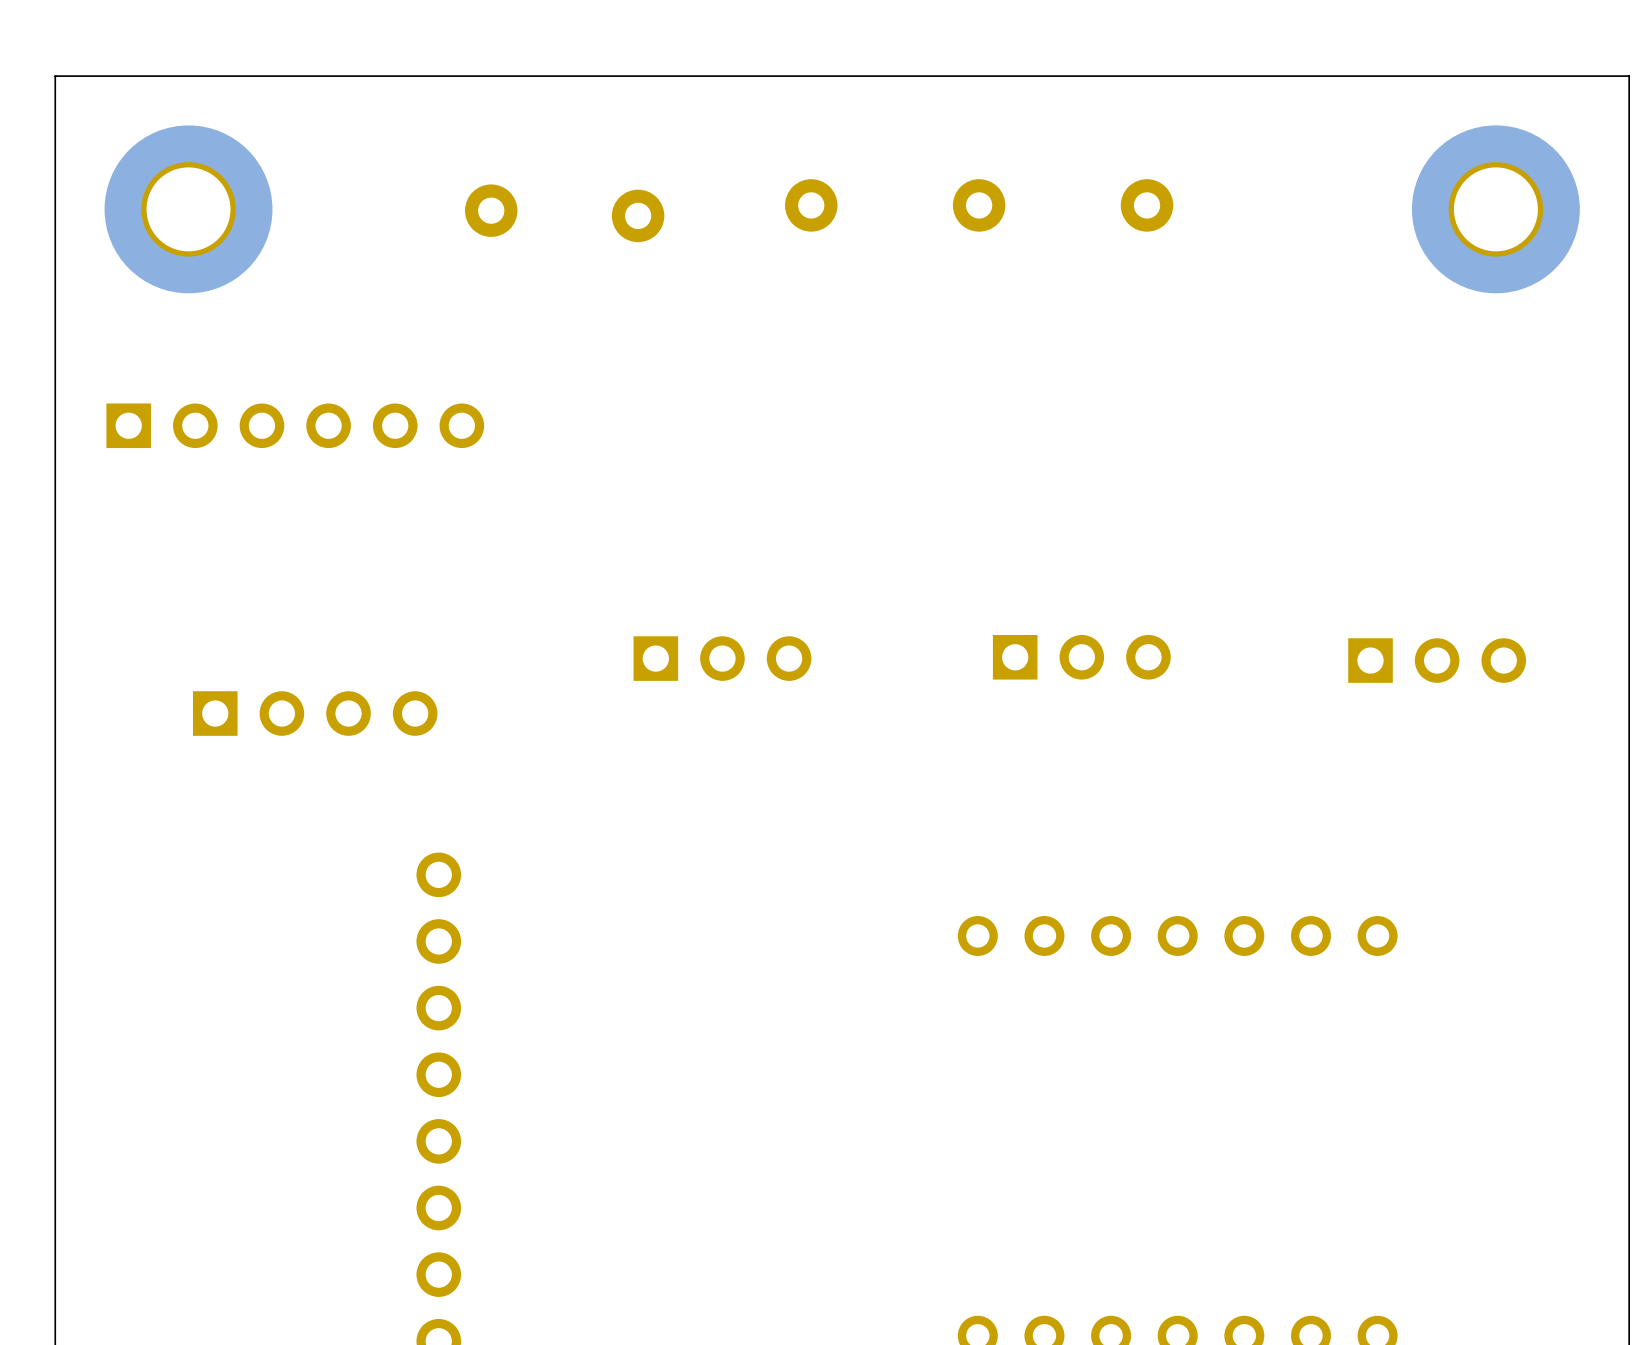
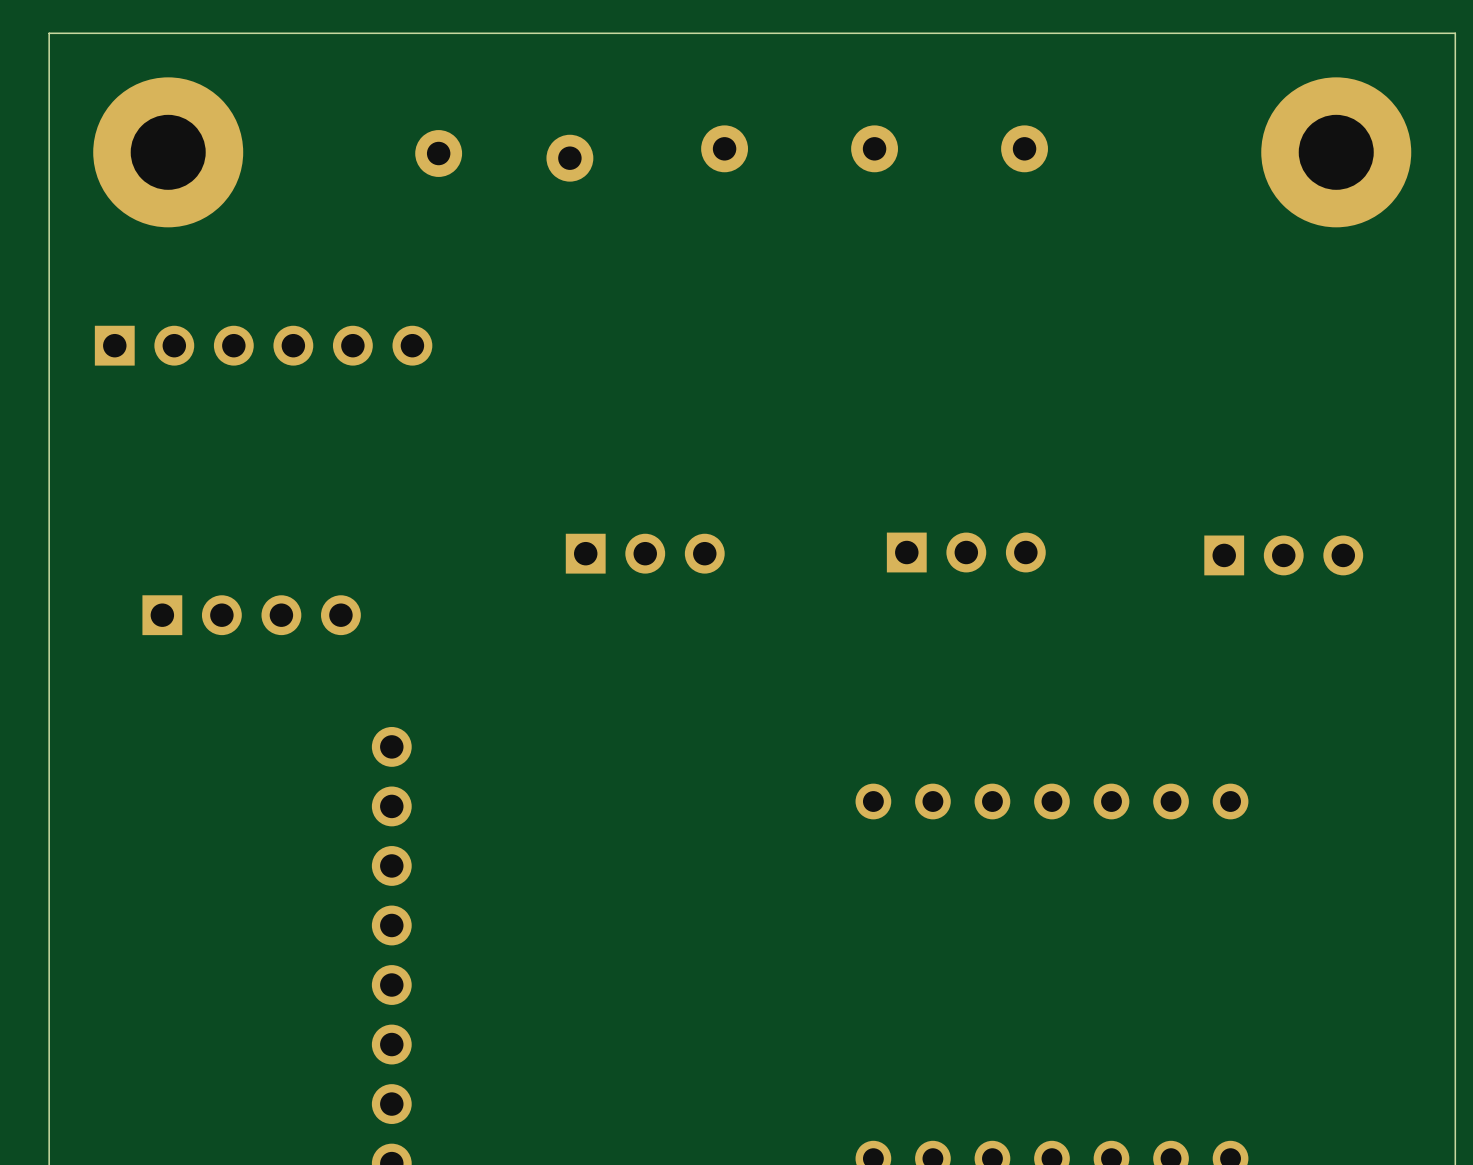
part position: (315, 713) -> (251, 615)

